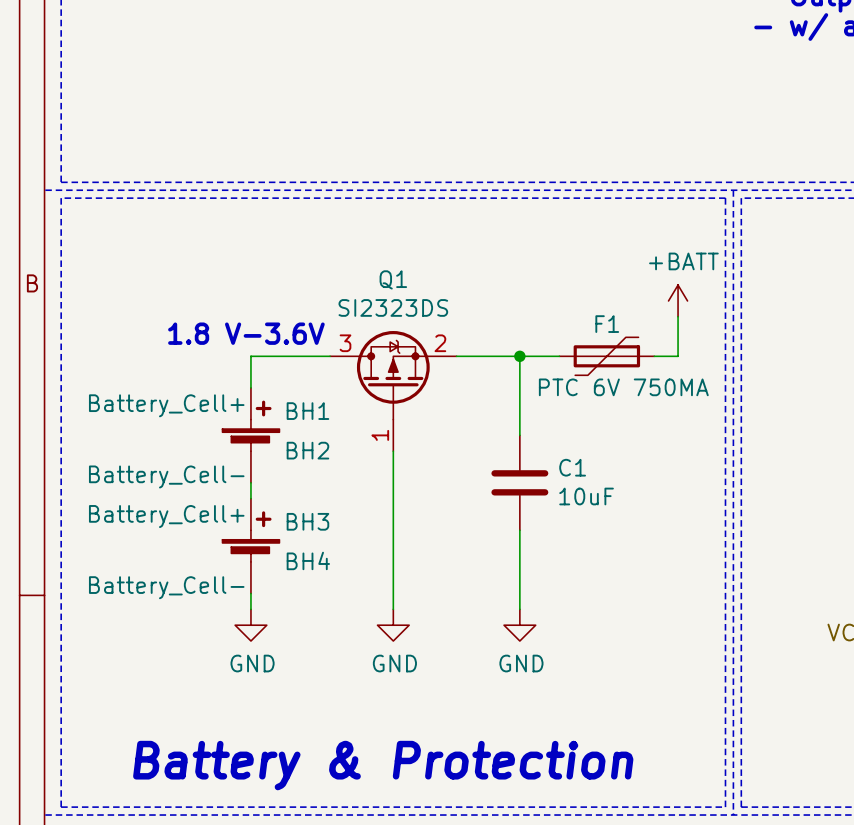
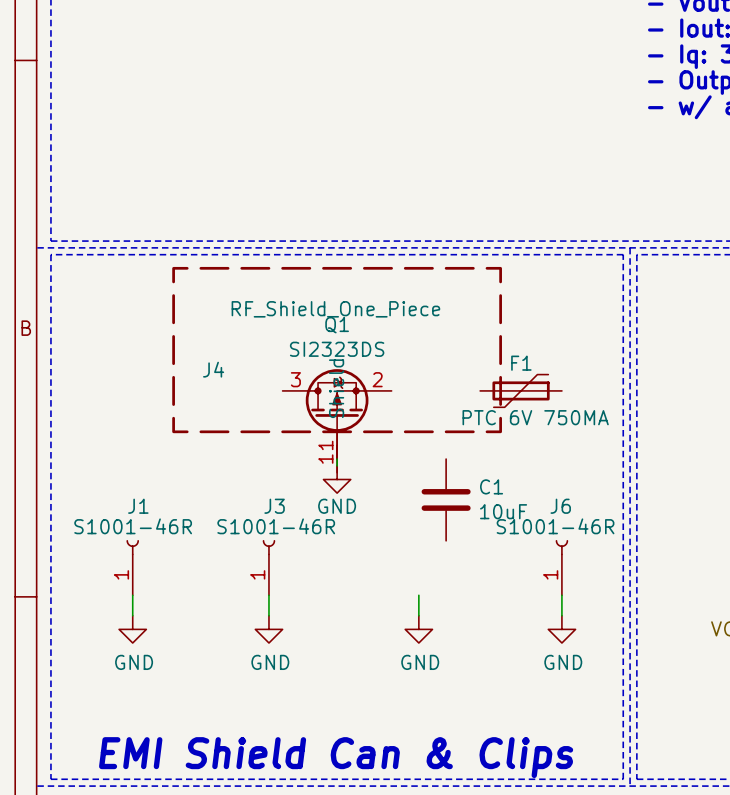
power symbol: +BATT (678, 300) -> none
wire: (678, 316) (678, 356) (654, 356) -> none
J4: none -> RF_Shield_One_Piece (337, 363)
text: 1.8 V-3.6V (246, 333) -> none
wire: (330, 356) (250, 356) (250, 387) -> none
wire: (456, 356) (559, 356) -> none
wire: (519, 356) (519, 435) -> none
junction: (519, 356) -> none
BH1: Battery_Cell+ (250, 410) -> none
wire: (393, 451) (393, 609) -> none
BH2: Battery_Cell- (250, 459) -> none
power symbol: none -> GND (337, 479)
wire: (250, 482) (250, 498) -> none
BH3: Battery_Cell+ (250, 520) -> none
wire: (519, 530) (519, 609) -> none
J1: none -> S1001-46R (132, 567)
J3: none -> S1001-46R (268, 567)
J6: none -> S1001-46R (561, 567)
BH4: Battery_Cell- (250, 570) -> none
wire: none -> (132, 595) (132, 615)
wire: (250, 593) (250, 609) -> none
wire: none -> (268, 595) (268, 615)
wire: none -> (418, 595) (418, 615)
wire: none -> (561, 595) (561, 615)
power symbol: GND (250, 625) -> none
power symbol: GND (393, 625) -> none
power symbol position: GND (519, 625) -> GND (418, 629)
power symbol: none -> GND (132, 629)
power symbol: none -> GND (268, 629)
power symbol: none -> GND (561, 629)
text: Battery & Protection (383, 765) -> none
text: none -> EMI Shield Can & Clips (336, 757)

